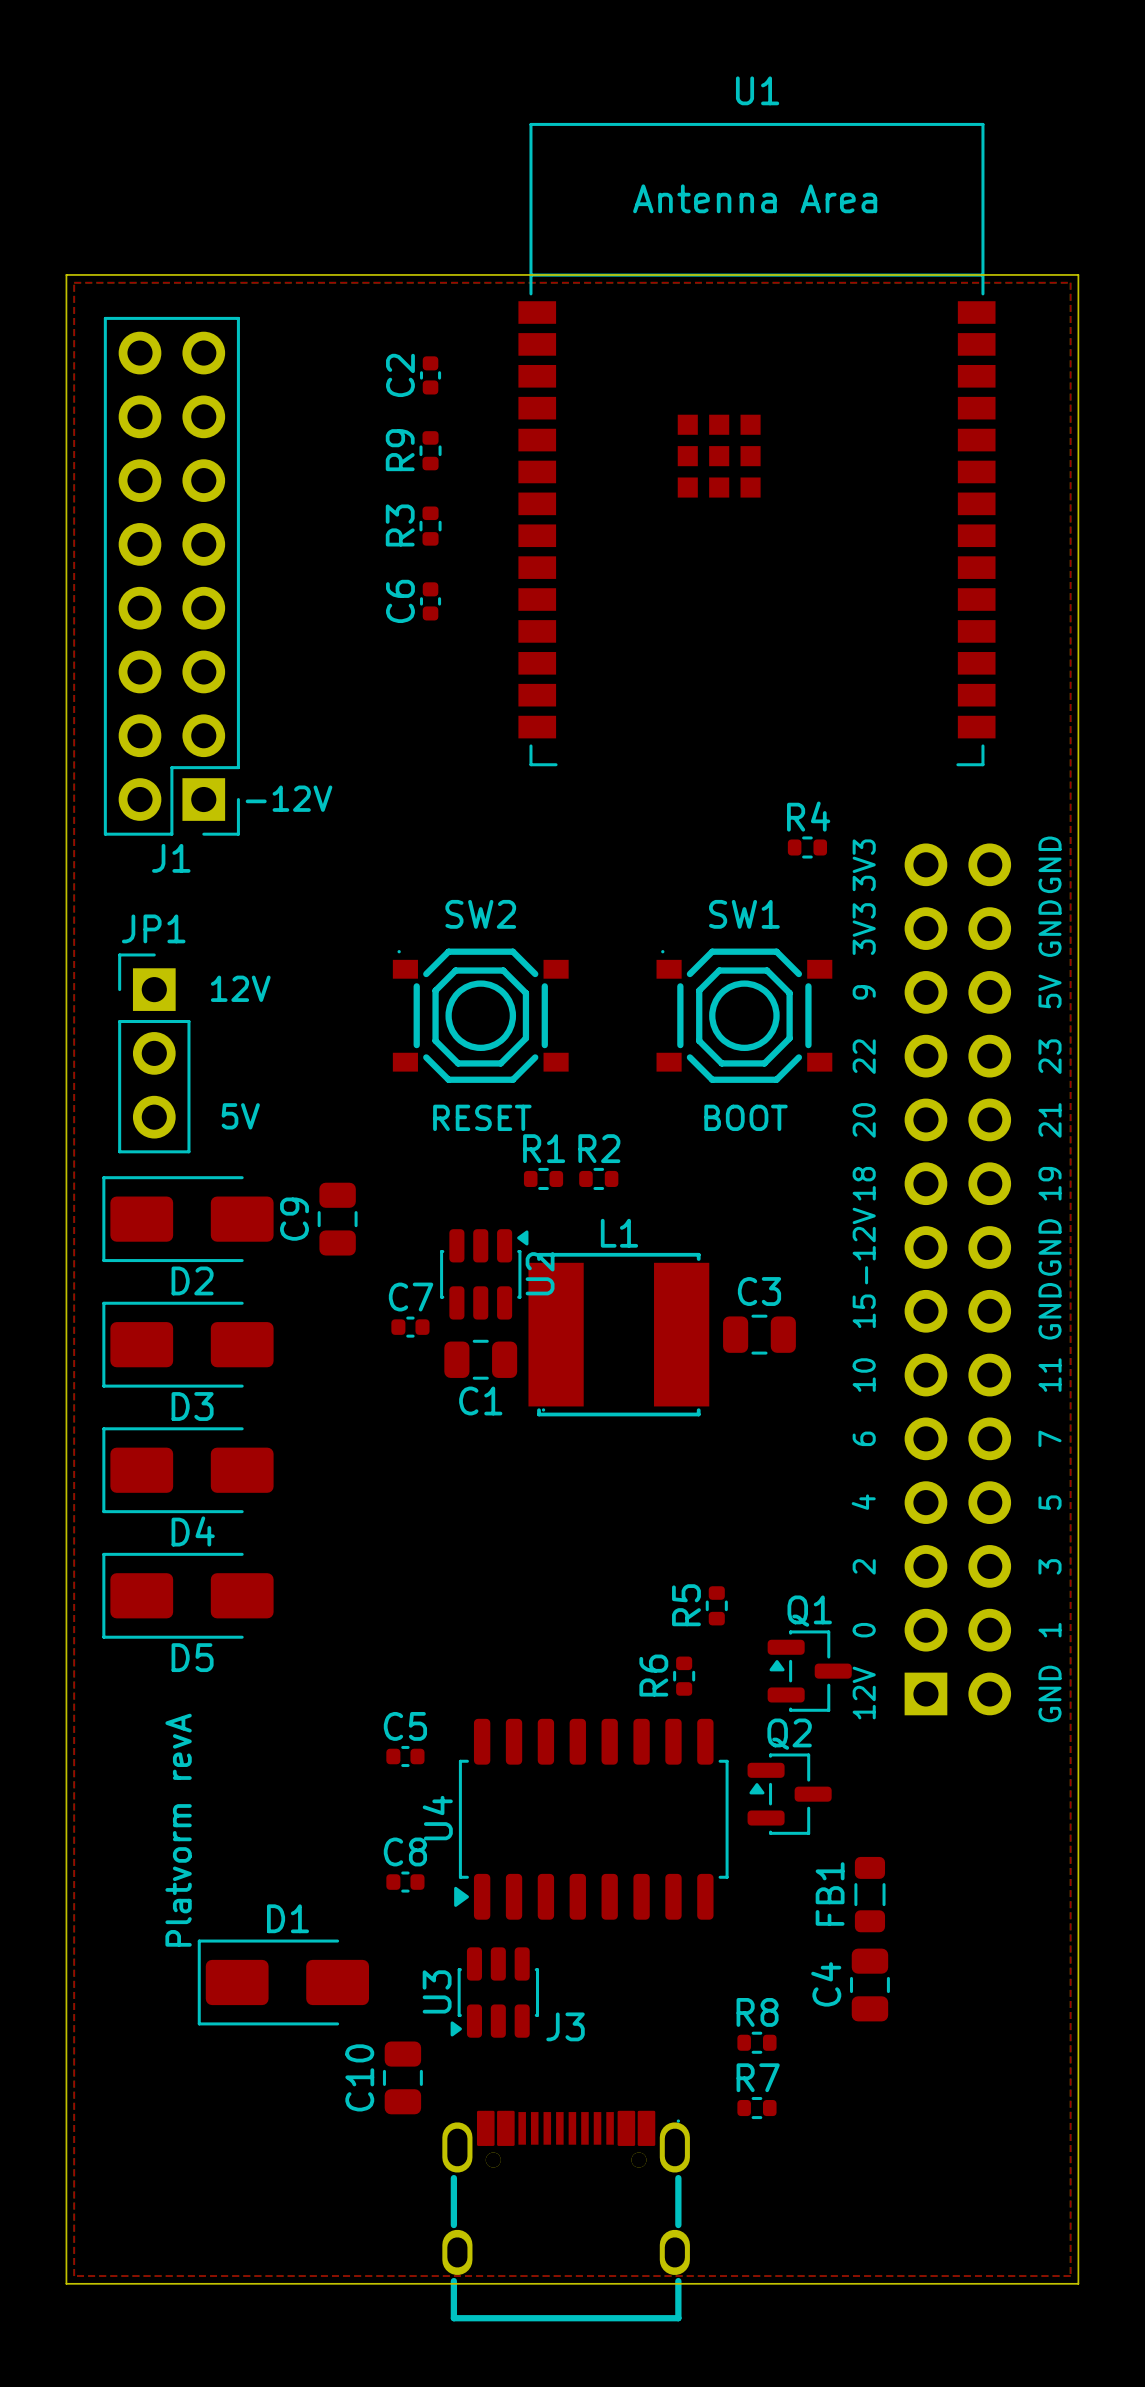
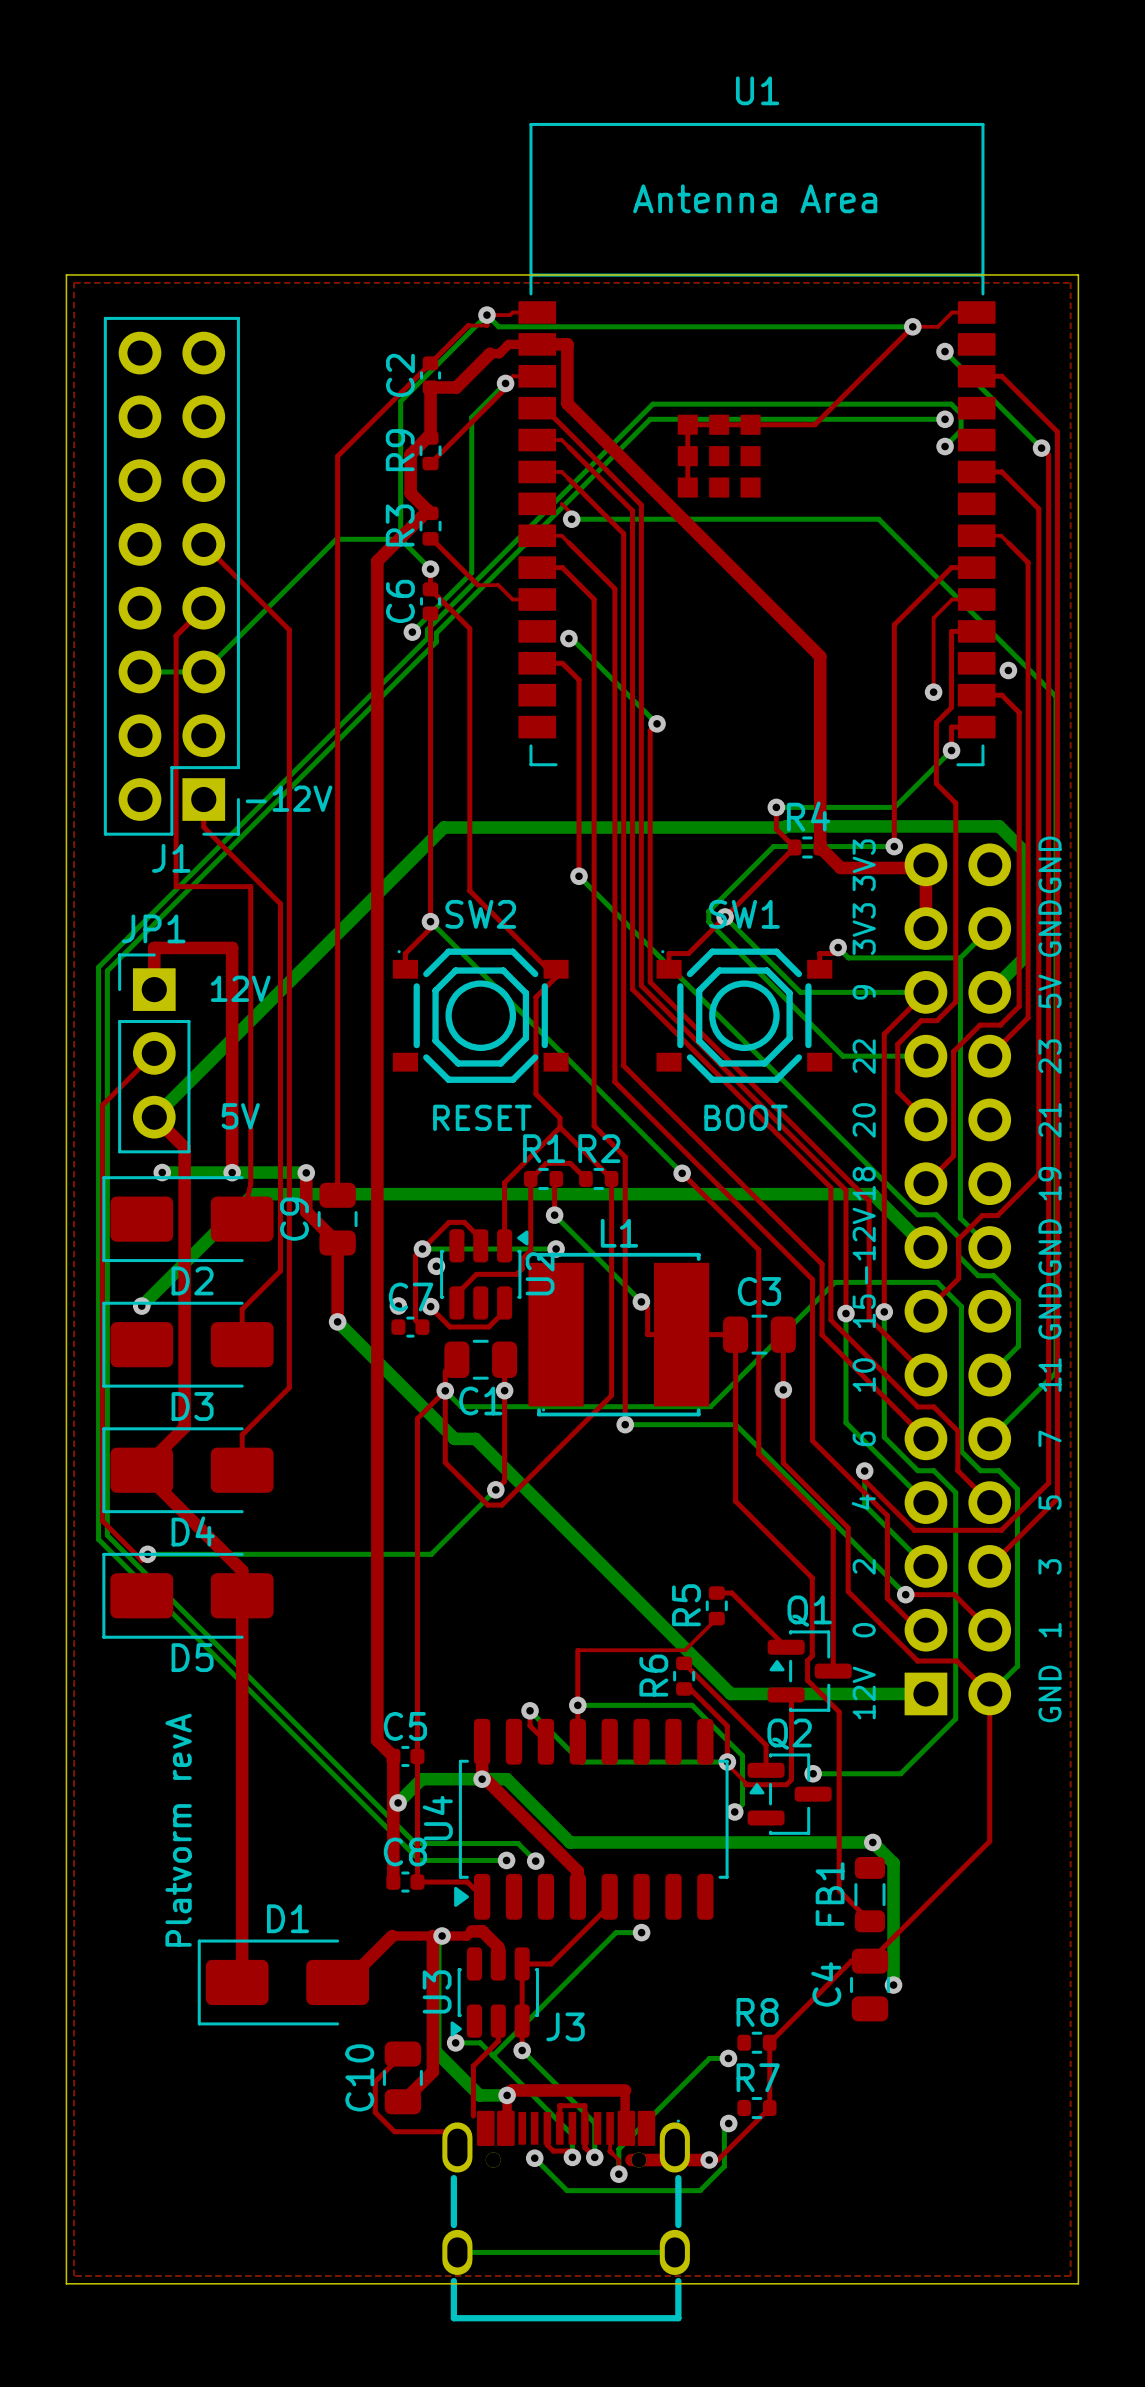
top track: none -> (537, 312) (486, 315) (486, 325) (468, 325) (337, 456) (337, 1195)
top track: none -> (976, 312) (952, 312) (937, 326) (912, 326) (814, 424) (687, 424) (687, 487)
via: none -> (486, 315)
bottom track: none -> (912, 326) (498, 326) (486, 315) (400, 401) (400, 539)
via: none -> (912, 326)
bottom track: none -> (945, 351) (1041, 448)
via: none -> (945, 351)
top track: none -> (537, 376) (512, 376) (505, 383) (505, 388) (430, 463)
top track: none -> (976, 376) (1001, 376) (1057, 431) (1057, 1498) (989, 1566)
bottom track: none -> (505, 383) (471, 417) (471, 572) (412, 632)
via: none -> (505, 383)
top track: none -> (537, 408) (544, 408) (641, 505) (641, 985) (846, 1190) (846, 1313)
bottom track: none -> (945, 419) (650, 419) (436, 633) (436, 642) (107, 970) (107, 1535) (415, 1843) (518, 1843) (535, 1861)
via: none -> (945, 419)
top track: none -> (537, 440) (561, 440) (632, 510) (632, 989) (830, 1187) (830, 1320) (917, 1406) (933, 1406) (957, 1430) (957, 1470) (989, 1502)
bottom track: none -> (945, 446) (961, 430) (961, 413) (951, 404) (652, 404) (427, 629) (427, 638) (98, 967) (98, 1539) (419, 1860) (506, 1860)
via: none -> (945, 446)
top track: none -> (1041, 448) (1048, 455) (1048, 1483) (1001, 1530) (914, 1530) (864, 1480) (864, 1471)
via: none -> (1041, 448)
top track: none -> (537, 471) (561, 471) (623, 533) (623, 1065) (822, 1264) (822, 1334) (925, 1438)
top track: none -> (976, 471) (1001, 471) (1038, 508) (1038, 1174) (997, 1215) (982, 1215) (958, 1239) (958, 1278) (925, 1311)
top track: none -> (561, 503) (570, 512)
top track: none -> (427, 510) (377, 561) (377, 1740) (393, 1756) (393, 1882)
top track: none -> (430, 513) (410, 493) (410, 454) (427, 437) (430, 437) (430, 387) (456, 387) (490, 353) (499, 353) (508, 344) (567, 344) (567, 403) (820, 656) (820, 847) (840, 867) (922, 867) (925, 864) (925, 928)
bottom track: none -> (571, 519) (878, 519) (1056, 696) (1056, 1372) (989, 1438)
via: none -> (571, 519)
top track: none -> (537, 535) (561, 535) (614, 588) (614, 1081) (812, 1279) (812, 1440) (887, 1515) (887, 1598) (919, 1630) (925, 1630)
top track: none -> (976, 535) (1001, 535) (1028, 562) (1028, 1017) (989, 1056)
top track: none -> (430, 538) (478, 585) (498, 585) (512, 599) (537, 599)
bottom track: none -> (400, 539) (336, 539) (203, 671) (140, 671)
bottom track: none -> (400, 539) (430, 569)
top track: none -> (203, 544) (289, 630) (289, 1387) (242, 1434) (242, 1470)
top track: none -> (537, 567) (562, 567) (594, 599) (594, 1125) (625, 1157) (625, 1424)
top track: none -> (976, 567) (951, 567) (894, 624) (894, 846)
top track: none -> (430, 569) (430, 589) (469, 628) (469, 890) (556, 977)
via: none -> (430, 569)
top track: none -> (976, 599) (952, 599) (933, 618) (933, 692)
top track: none -> (203, 608) (176, 635) (176, 886) (250, 886) (250, 1183) (242, 1219)
top track: none -> (430, 613) (430, 928) (405, 953) (405, 969)
top track: none -> (976, 631) (951, 631) (951, 707) (936, 722) (936, 783) (955, 803) (955, 1001) (936, 1020) (921, 1020) (897, 1044) (897, 1091) (925, 1119)
via: none -> (412, 632)
bottom track: none -> (568, 638) (571, 638) (657, 723)
via: none -> (568, 638)
top track: none -> (537, 663) (562, 663) (579, 679) (579, 876)
via: none -> (1008, 670)
via: none -> (933, 692)
top track: none -> (976, 695) (1001, 695) (1019, 712) (1019, 1006) (1000, 1025) (980, 1025) (953, 1051) (953, 1156) (925, 1183)
top track: none -> (657, 723) (650, 730) (650, 982) (869, 1201) (869, 1318) (925, 1375)
via: none -> (657, 723)
top track: none -> (976, 727) (951, 727) (951, 750)
bottom track: none -> (951, 750) (894, 807) (776, 807)
via: none -> (951, 750)
top track: none -> (203, 799) (203, 827) (280, 903) (280, 1271) (242, 1309) (242, 1344)
top track: none -> (776, 807) (776, 829) (794, 847) (688, 953) (669, 953) (669, 969)
via: none -> (776, 807)
bottom track: none -> (894, 846) (773, 846) (708, 911) (708, 922) (842, 1056) (925, 1056)
via: none -> (894, 846)
bottom track: none -> (579, 876) (917, 1214) (936, 1214) (958, 1237) (958, 1256) (978, 1275) (993, 1275) (1018, 1300) (1018, 1346) (989, 1375)
via: none -> (579, 876)
bottom track: none -> (725, 916) (800, 992) (925, 992)
via: none -> (725, 916)
bottom track: none -> (430, 921) (682, 1173)
via: none -> (430, 921)
bottom track: none -> (989, 928) (960, 957)
top track: none -> (838, 947) (832, 953) (819, 953) (819, 969)
bottom track: none -> (838, 947) (848, 957) (960, 957)
via: none -> (838, 947)
bottom track: none -> (960, 957) (960, 1218) (989, 1247)
top track: none -> (556, 977) (535, 997) (535, 1094) (559, 1118) (559, 1127)
top track: none -> (154, 989) (154, 947) (232, 947) (232, 1172)
top track: none -> (925, 992) (884, 1034) (884, 1311)
bottom track: none -> (989, 992) (1023, 958) (1023, 850) (999, 826) (443, 827) (154, 1117)
top track: none -> (154, 1053) (102, 1105) (102, 1520) (141, 1560) (147, 1554)
top track: none -> (154, 1117) (184, 1147) (184, 1427) (141, 1470) (242, 1570) (242, 1977) (237, 1982)
top track: none -> (559, 1127) (611, 1178) (611, 1395) (501, 1505) (487, 1505) (445, 1462) (445, 1371) (456, 1359)
top track: none -> (559, 1127) (504, 1182) (504, 1245)
bottom track: none -> (162, 1172) (305, 1172)
via: none -> (162, 1172)
via: none -> (232, 1172)
top track: none -> (306, 1172) (306, 1211) (337, 1242) (337, 1321)
via: none -> (306, 1172)
top track: none -> (682, 1173) (758, 1249) (758, 1454) (833, 1528) (833, 1671)
via: none -> (682, 1173)
top track: none -> (556, 1178) (554, 1180) (554, 1215)
top track: none -> (585, 1178) (570, 1163) (546, 1163) (530, 1178) (530, 1250) (522, 1259) (522, 1268) (516, 1274) (476, 1274) (456, 1293) (456, 1302)
bottom track: none -> (554, 1215) (641, 1301)
via: none -> (554, 1215)
top track: none -> (480, 1245) (480, 1238) (464, 1222) (449, 1222) (415, 1255) (415, 1320) (422, 1327)
bottom track: none -> (925, 1247) (872, 1194) (253, 1194) (141, 1306)
bottom track: none -> (422, 1249) (556, 1249)
via: none -> (422, 1249)
via: none -> (556, 1249)
via: none -> (436, 1266)
top track: none -> (641, 1301) (647, 1308) (647, 1334) (735, 1334) (735, 1501) (812, 1577) (812, 1655) (807, 1660) (807, 1680) (839, 1711) (839, 1890) (869, 1921)
via: none -> (641, 1301)
top track: none -> (504, 1302) (504, 1311) (488, 1326) (450, 1326) (430, 1306)
via: none -> (398, 1305)
via: none -> (141, 1306)
via: none -> (430, 1306)
bottom track: none -> (884, 1311) (884, 1437) (917, 1470) (933, 1470) (955, 1492) (955, 1718) (900, 1773) (813, 1773)
via: none -> (884, 1311)
bottom track: none -> (846, 1313) (846, 1422) (925, 1502)
via: none -> (846, 1313)
bottom track: none -> (337, 1321) (454, 1438) (475, 1438) (730, 1693) (925, 1693)
via: none -> (337, 1321)
top track: none -> (783, 1334) (783, 1463) (848, 1527) (848, 1591) (917, 1661) (956, 1661) (989, 1693) (989, 1841) (869, 1961) (851, 1961) (769, 2042) (769, 2108) (717, 2160) (631, 2160)
top track: none -> (504, 1359) (504, 1481) (495, 1489)
via: none -> (783, 1389)
top track: none -> (445, 1390) (417, 1418) (417, 1882) (467, 1882) (482, 1896)
bottom track: none -> (445, 1390) (461, 1406) (710, 1406) (834, 1282) (937, 1282) (961, 1306) (961, 1451) (980, 1470) (999, 1470) (1017, 1489) (1017, 1666) (989, 1693)
via: none -> (445, 1390)
via: none -> (504, 1390)
bottom track: none -> (625, 1424) (735, 1424) (905, 1594)
via: none -> (625, 1424)
bottom track: none -> (864, 1471) (864, 1505) (925, 1566)
via: none -> (864, 1471)
bottom track: none -> (495, 1489) (431, 1554) (147, 1554)
via: none -> (495, 1489)
via: none -> (147, 1554)
top track: none -> (716, 1593) (731, 1593) (786, 1647)
top track: none -> (905, 1594) (954, 1594) (989, 1630)
via: none -> (905, 1594)
top track: none -> (716, 1618) (685, 1650) (577, 1650) (577, 1741)
top track: none -> (684, 1663) (766, 1745) (766, 1770)
top track: none -> (684, 1688) (690, 1688) (727, 1726) (727, 1764) (745, 1784) (786, 1784) (791, 1779) (791, 1700) (786, 1694)
bottom track: none -> (577, 1705) (692, 1705) (742, 1755) (742, 1804) (734, 1811)
via: none -> (577, 1705)
top track: none -> (530, 1710) (530, 1725) (545, 1741)
bottom track: none -> (530, 1710) (581, 1762) (727, 1762)
via: none -> (530, 1710)
top track: none -> (482, 1741) (482, 1779) (485, 1779) (577, 1871) (577, 1896)
via: none -> (727, 1762)
via: none -> (813, 1773)
via: none -> (482, 1779)
bottom track: none -> (398, 1802) (421, 1779) (506, 1779) (570, 1842) (872, 1842) (893, 1863) (893, 1985)
via: none -> (398, 1802)
via: none -> (734, 1811)
via: none -> (872, 1842)
via: none -> (506, 1860)
via: none -> (535, 1861)
top track: none -> (609, 1896) (609, 1905) (551, 1963) (522, 1963) (522, 2050)
bottom track: none -> (641, 1932) (616, 1932) (493, 2055)
via: none -> (641, 1932)
top track: none -> (432, 1936) (432, 2071) (402, 2101)
bottom track: none -> (442, 1936) (435, 1942) (435, 2051) (479, 2095) (507, 2095)
via: none -> (442, 1936)
top track: none -> (498, 1963) (498, 1947) (482, 1931) (471, 1931) (467, 1936) (392, 1936) (345, 1982) (337, 1982)
via: none -> (893, 1985)
top track: none -> (498, 2021) (498, 2041) (473, 2066) (473, 2116)
bottom track: none -> (455, 2042) (480, 2042) (493, 2055)
via: none -> (455, 2042)
bottom track: none -> (522, 2050) (594, 2123) (594, 2157)
via: none -> (522, 2050)
top track: none -> (402, 2054) (375, 2081) (375, 2112) (394, 2131) (457, 2131)
bottom track: none -> (493, 2055) (572, 2134) (572, 2157)
bottom track: none -> (728, 2058) (709, 2058) (618, 2149) (618, 2174)
via: none -> (728, 2058)
via: none -> (507, 2095)
bottom track: none -> (728, 2123) (724, 2127) (724, 2166) (700, 2190) (567, 2190) (534, 2158)
via: none -> (728, 2123)
top track: none -> (505, 2128) (507, 2095) (512, 2090) (625, 2090) (626, 2128)
top track: none -> (547, 2128) (547, 2144) (553, 2151) (572, 2151)
top track: none -> (559, 2128) (559, 2105) (584, 2105) (584, 2147) (594, 2157)
top track: none -> (610, 2128) (610, 2151) (618, 2160) (618, 2174)
via: none -> (572, 2157)
via: none -> (594, 2157)
via: none -> (534, 2158)
via: none -> (709, 2160)
via: none -> (618, 2174)
bottom track: none -> (457, 2252) (674, 2252)

